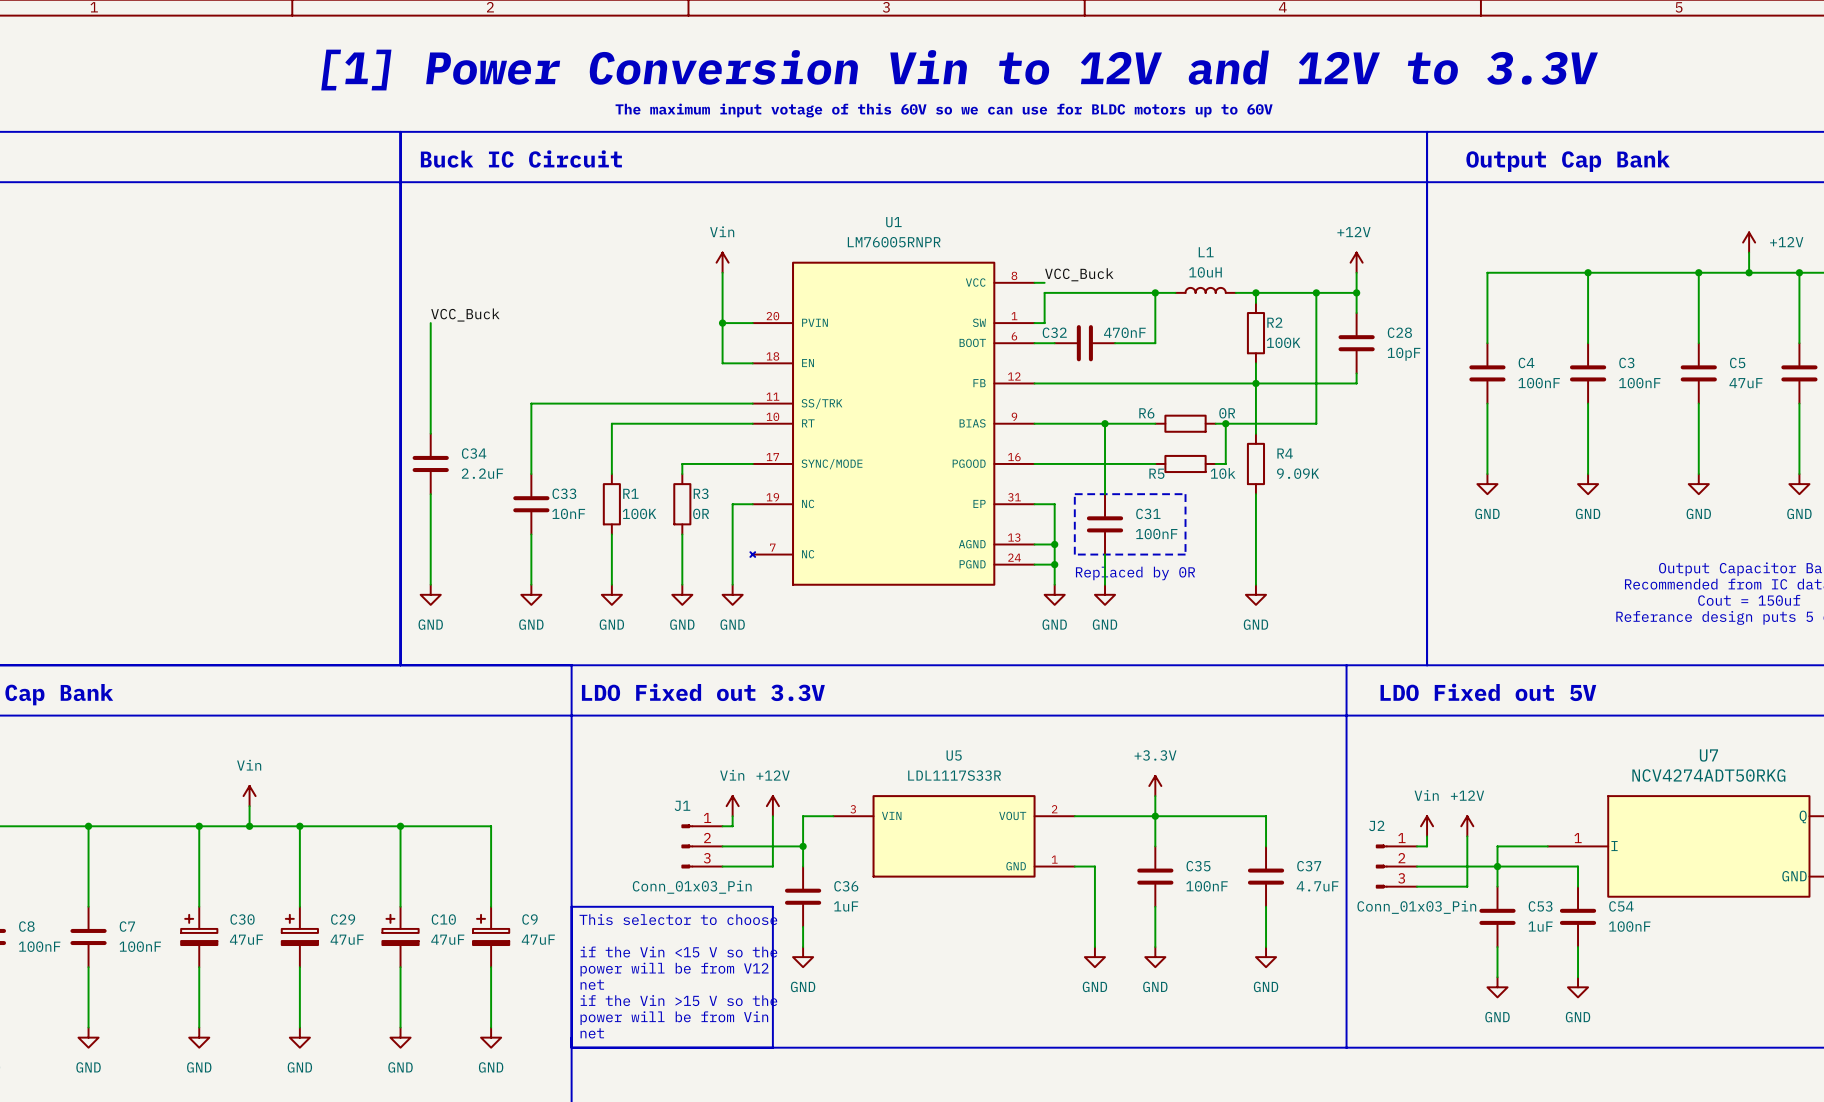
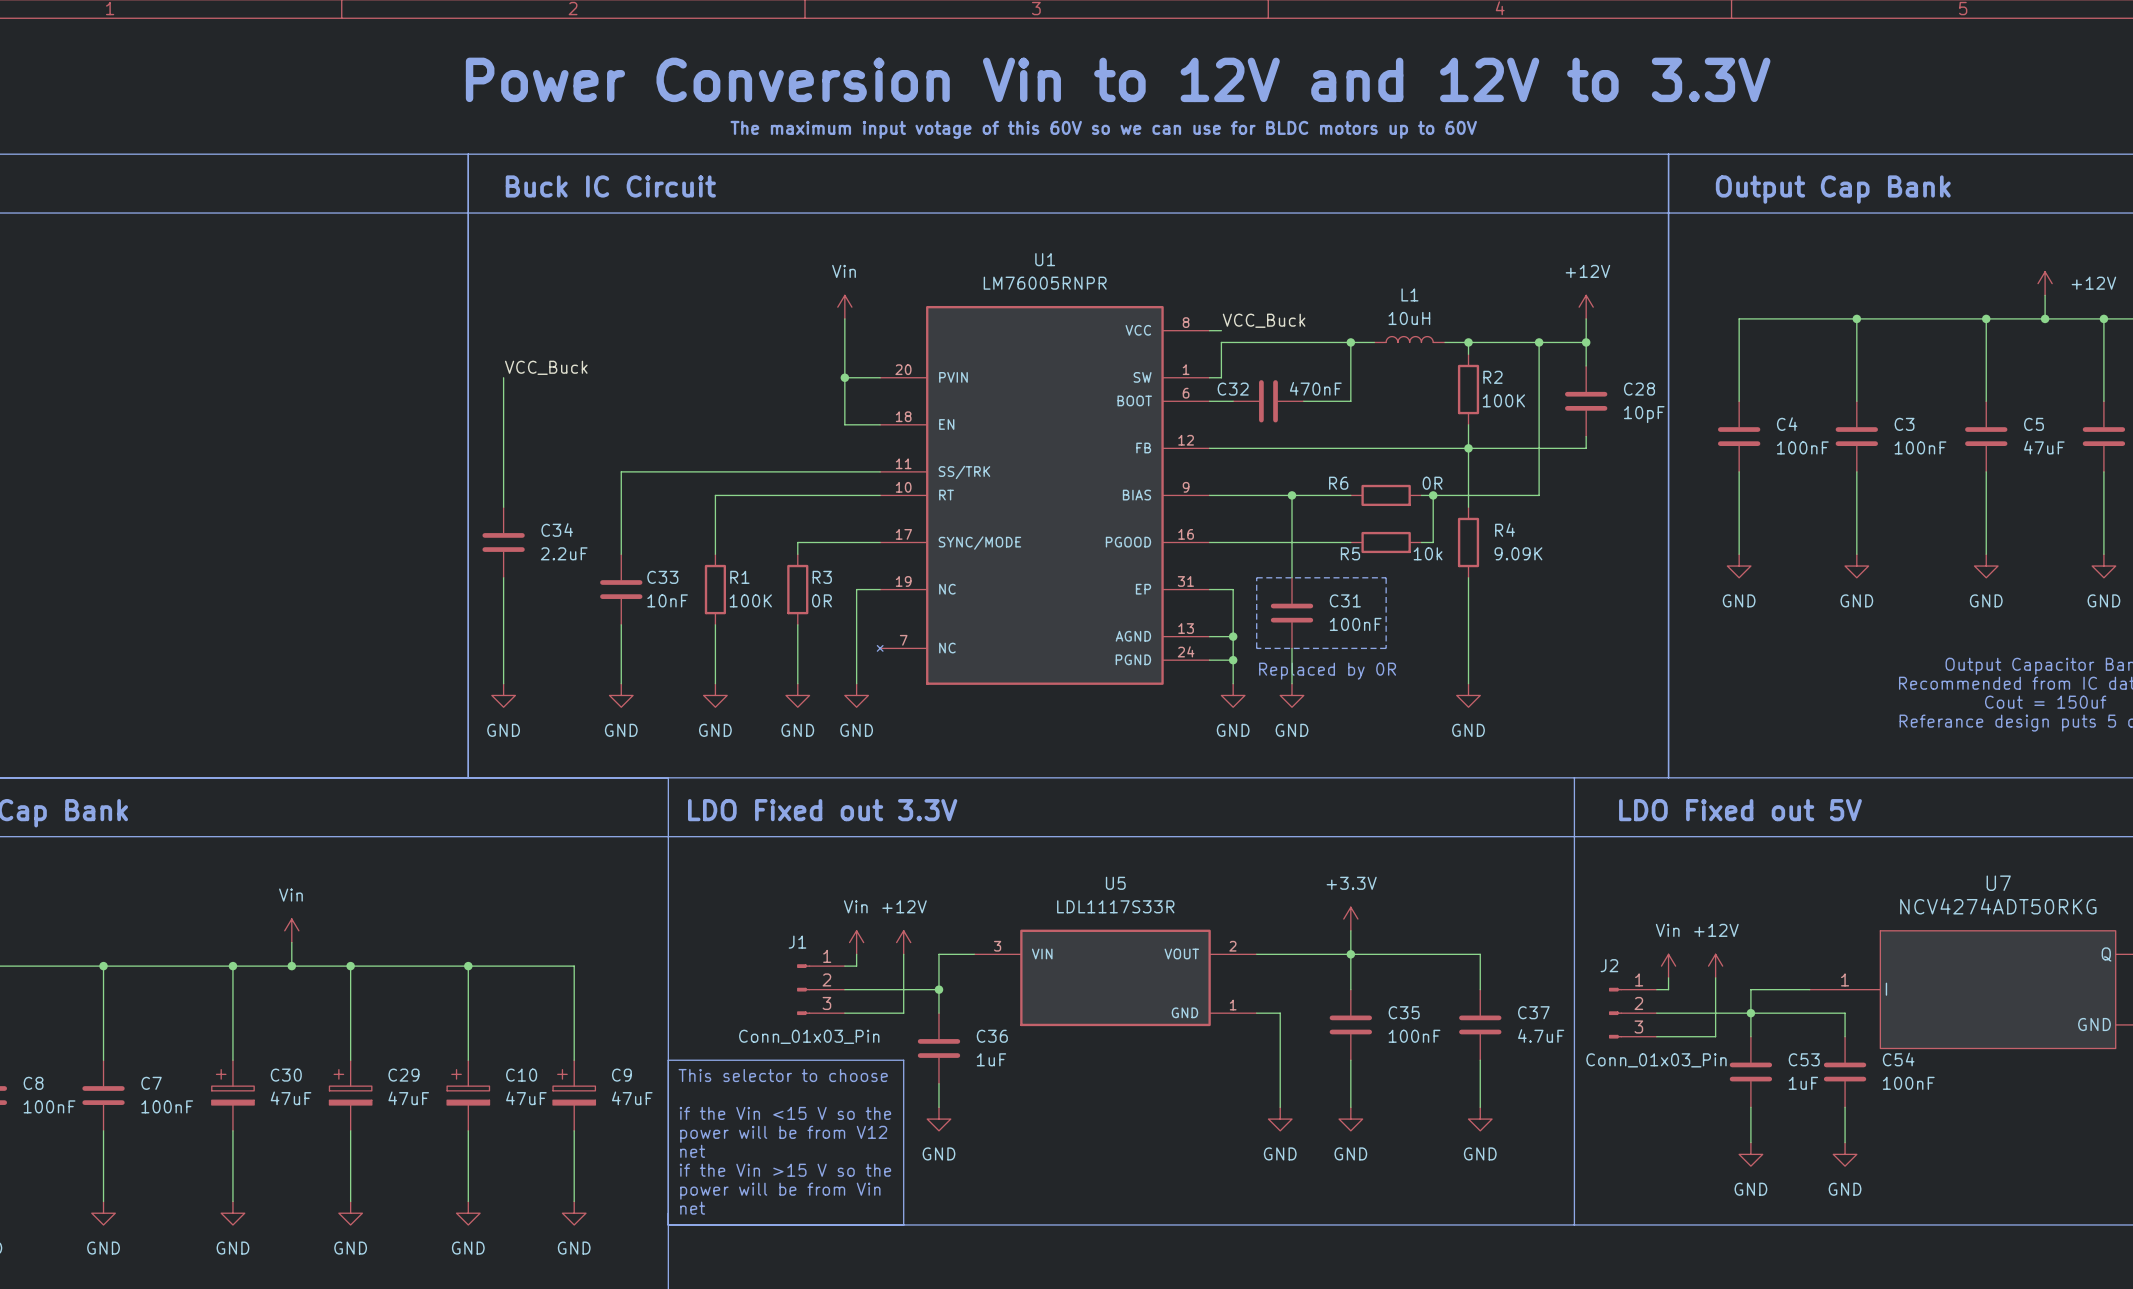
text: [1] Power Conversion Vin to 12V and 12V to 3.3V (959, 70) -> Power Conversion Vin to 12V and 12V to 3.3V (1118, 79)

